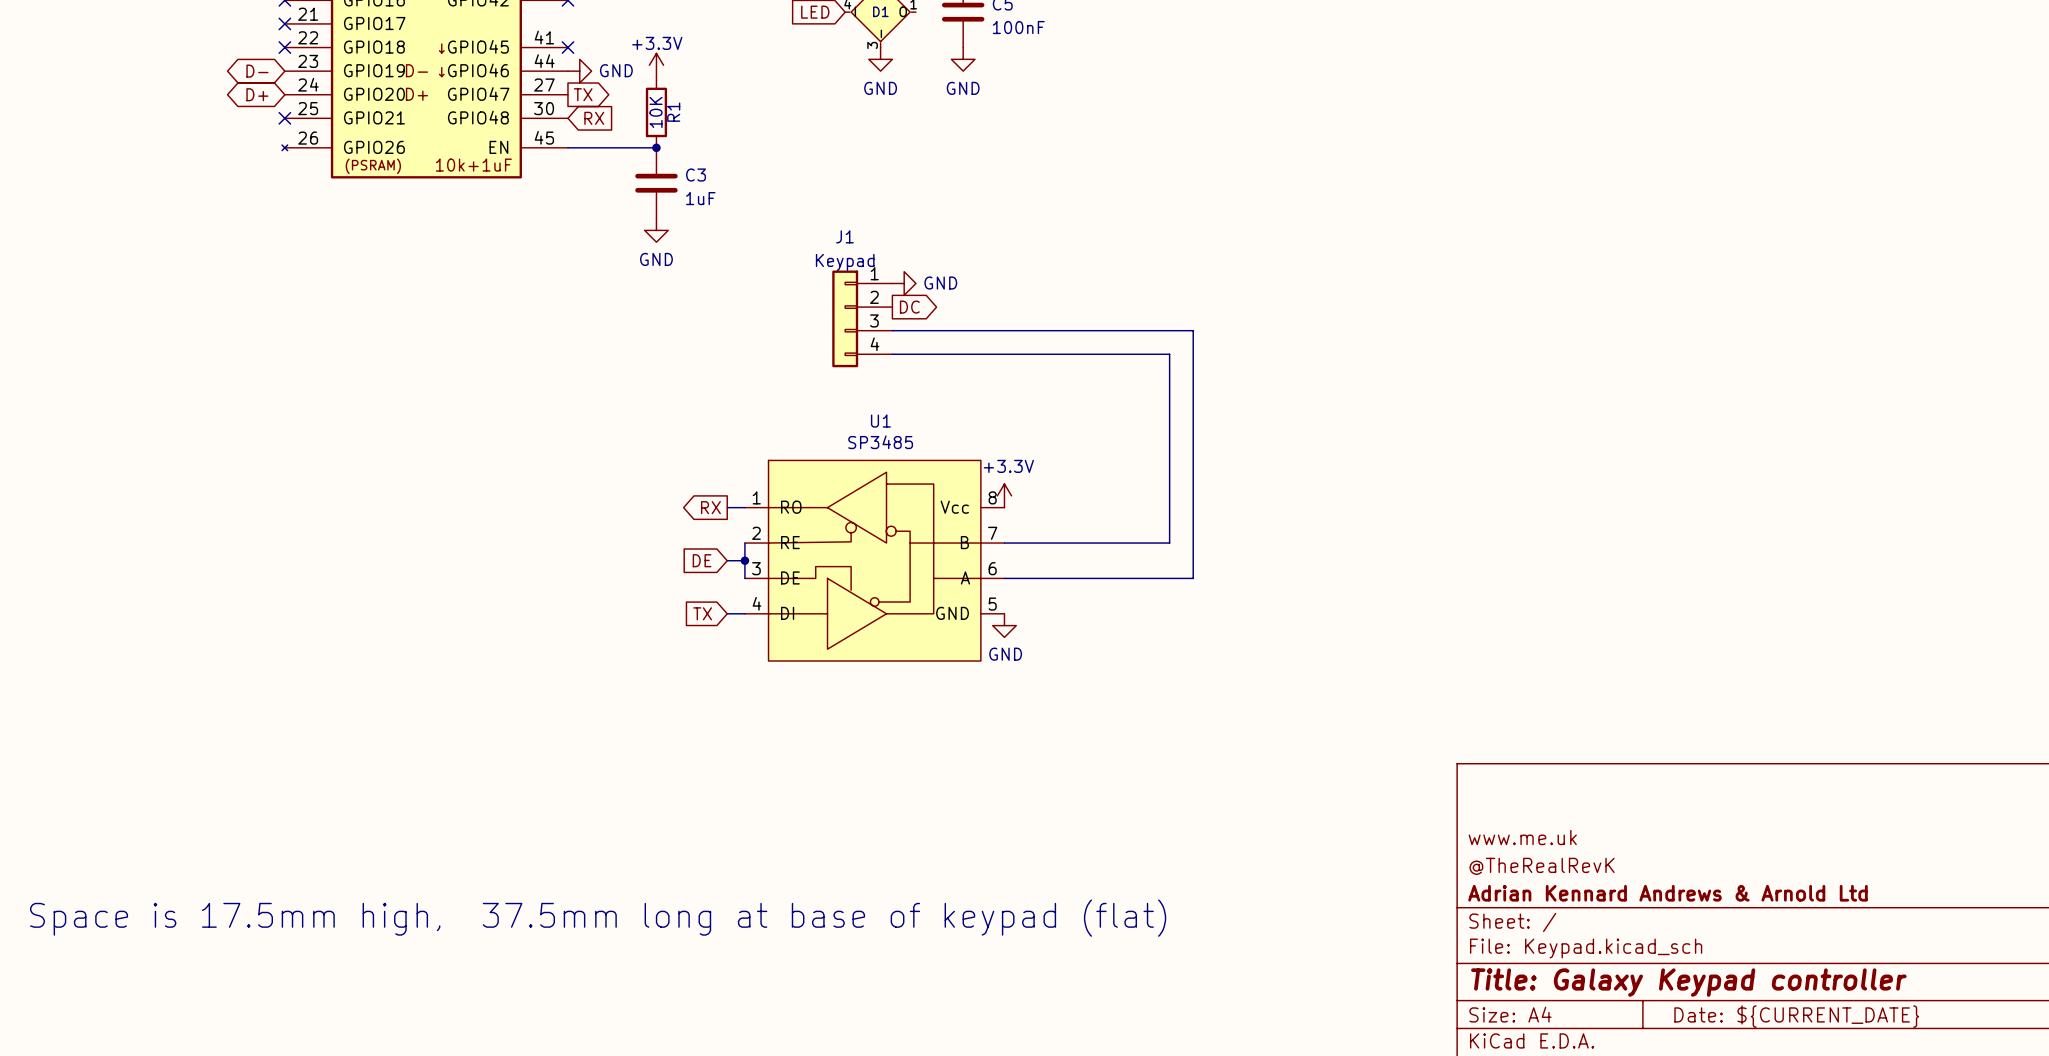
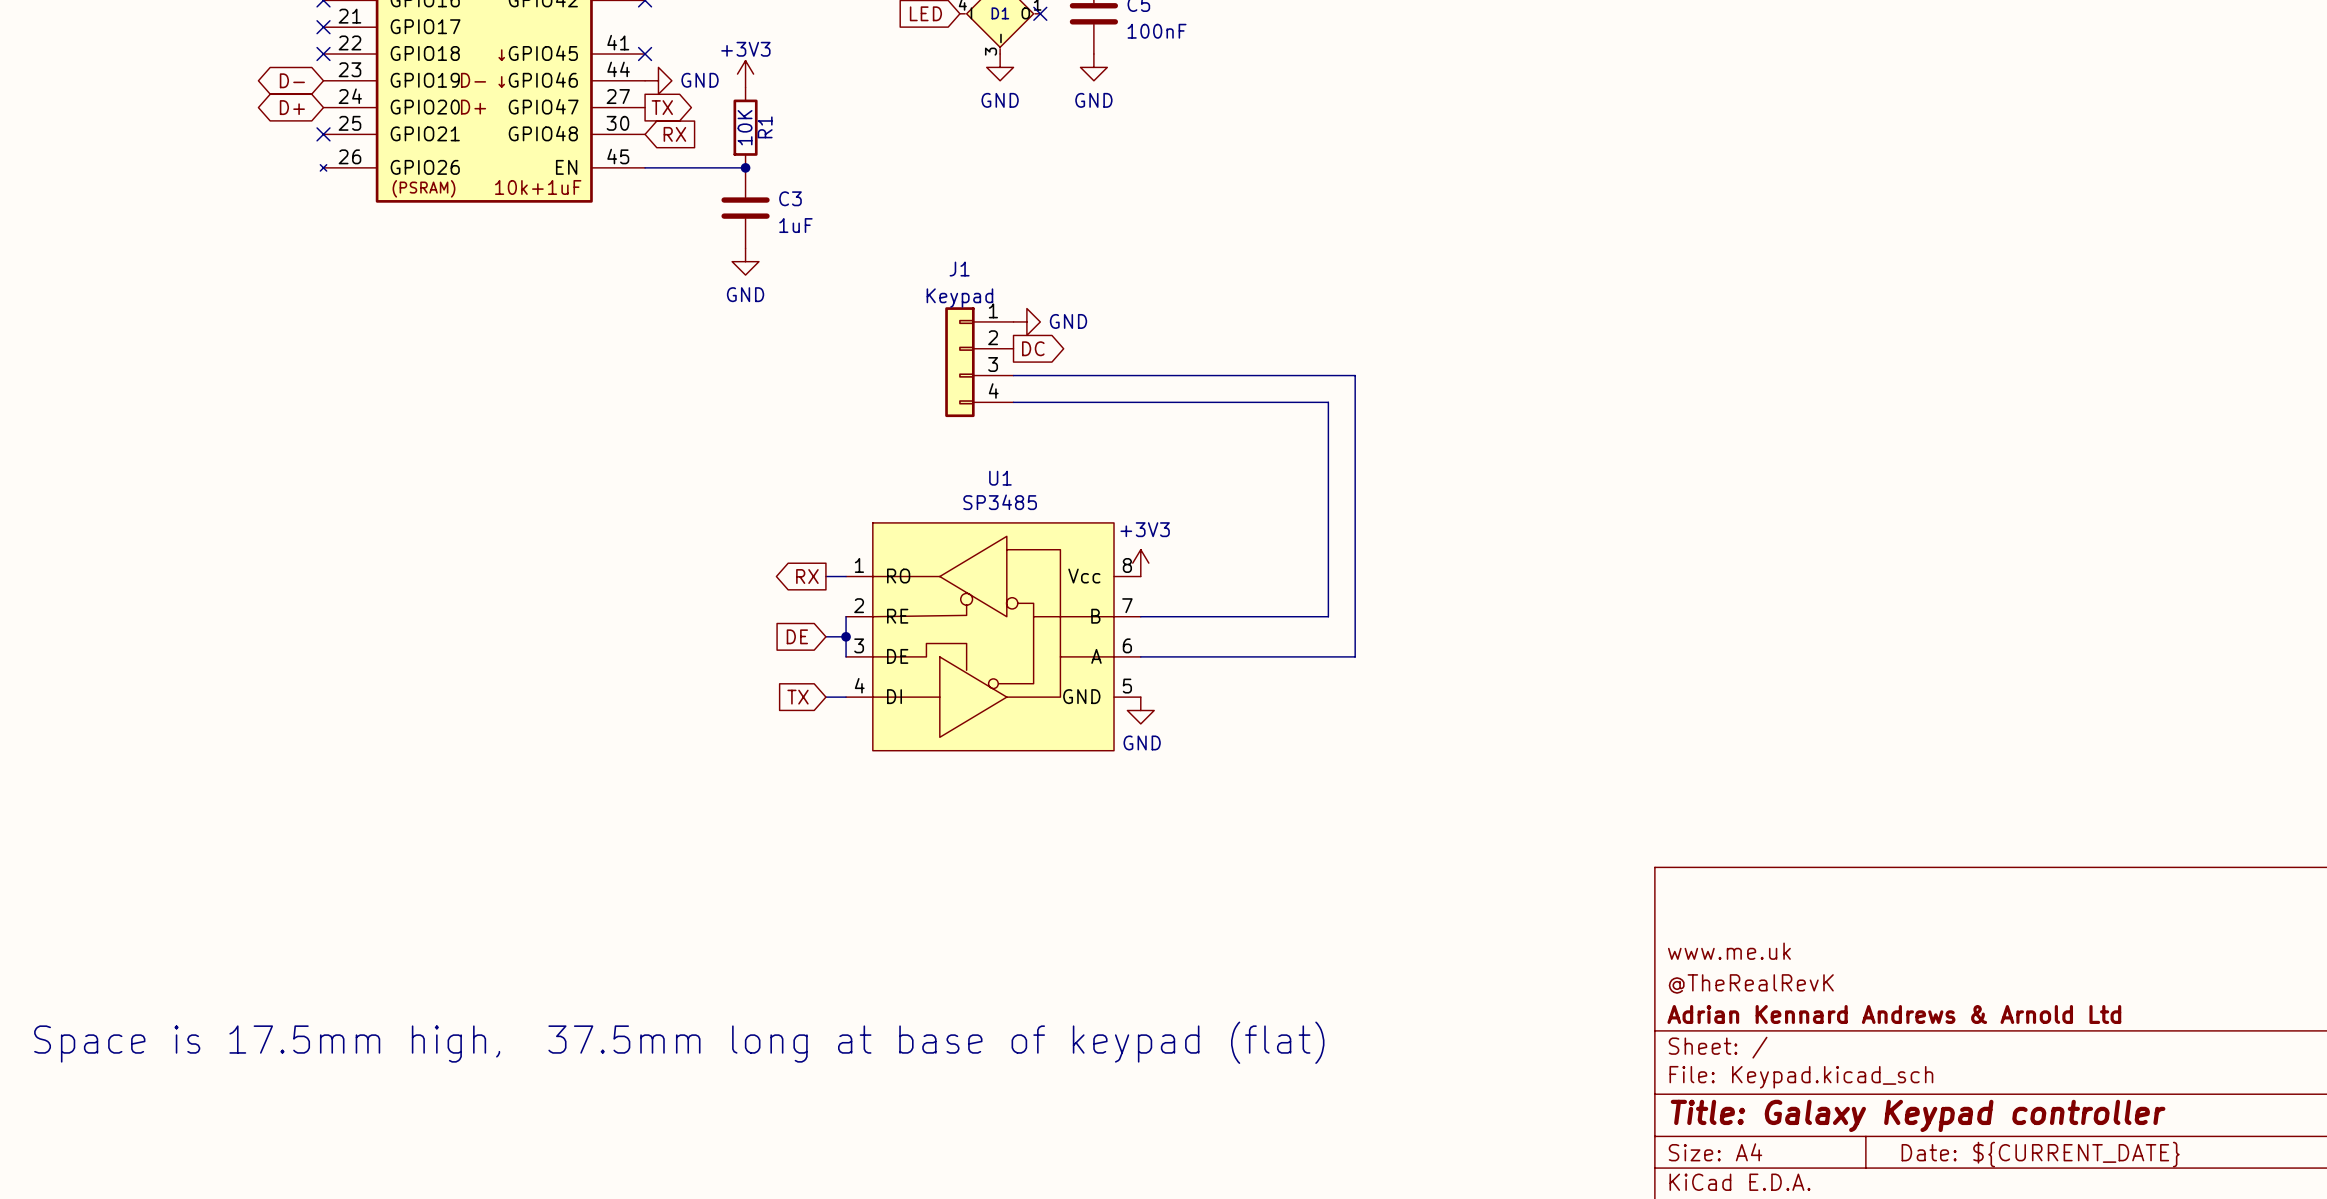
no-connect mark: none -> (1040, 13)
power symbol: +3.3V (656, 65) -> +3V3 (745, 74)
power symbol: +3.3V (1004, 495) -> +3V3 (1140, 563)

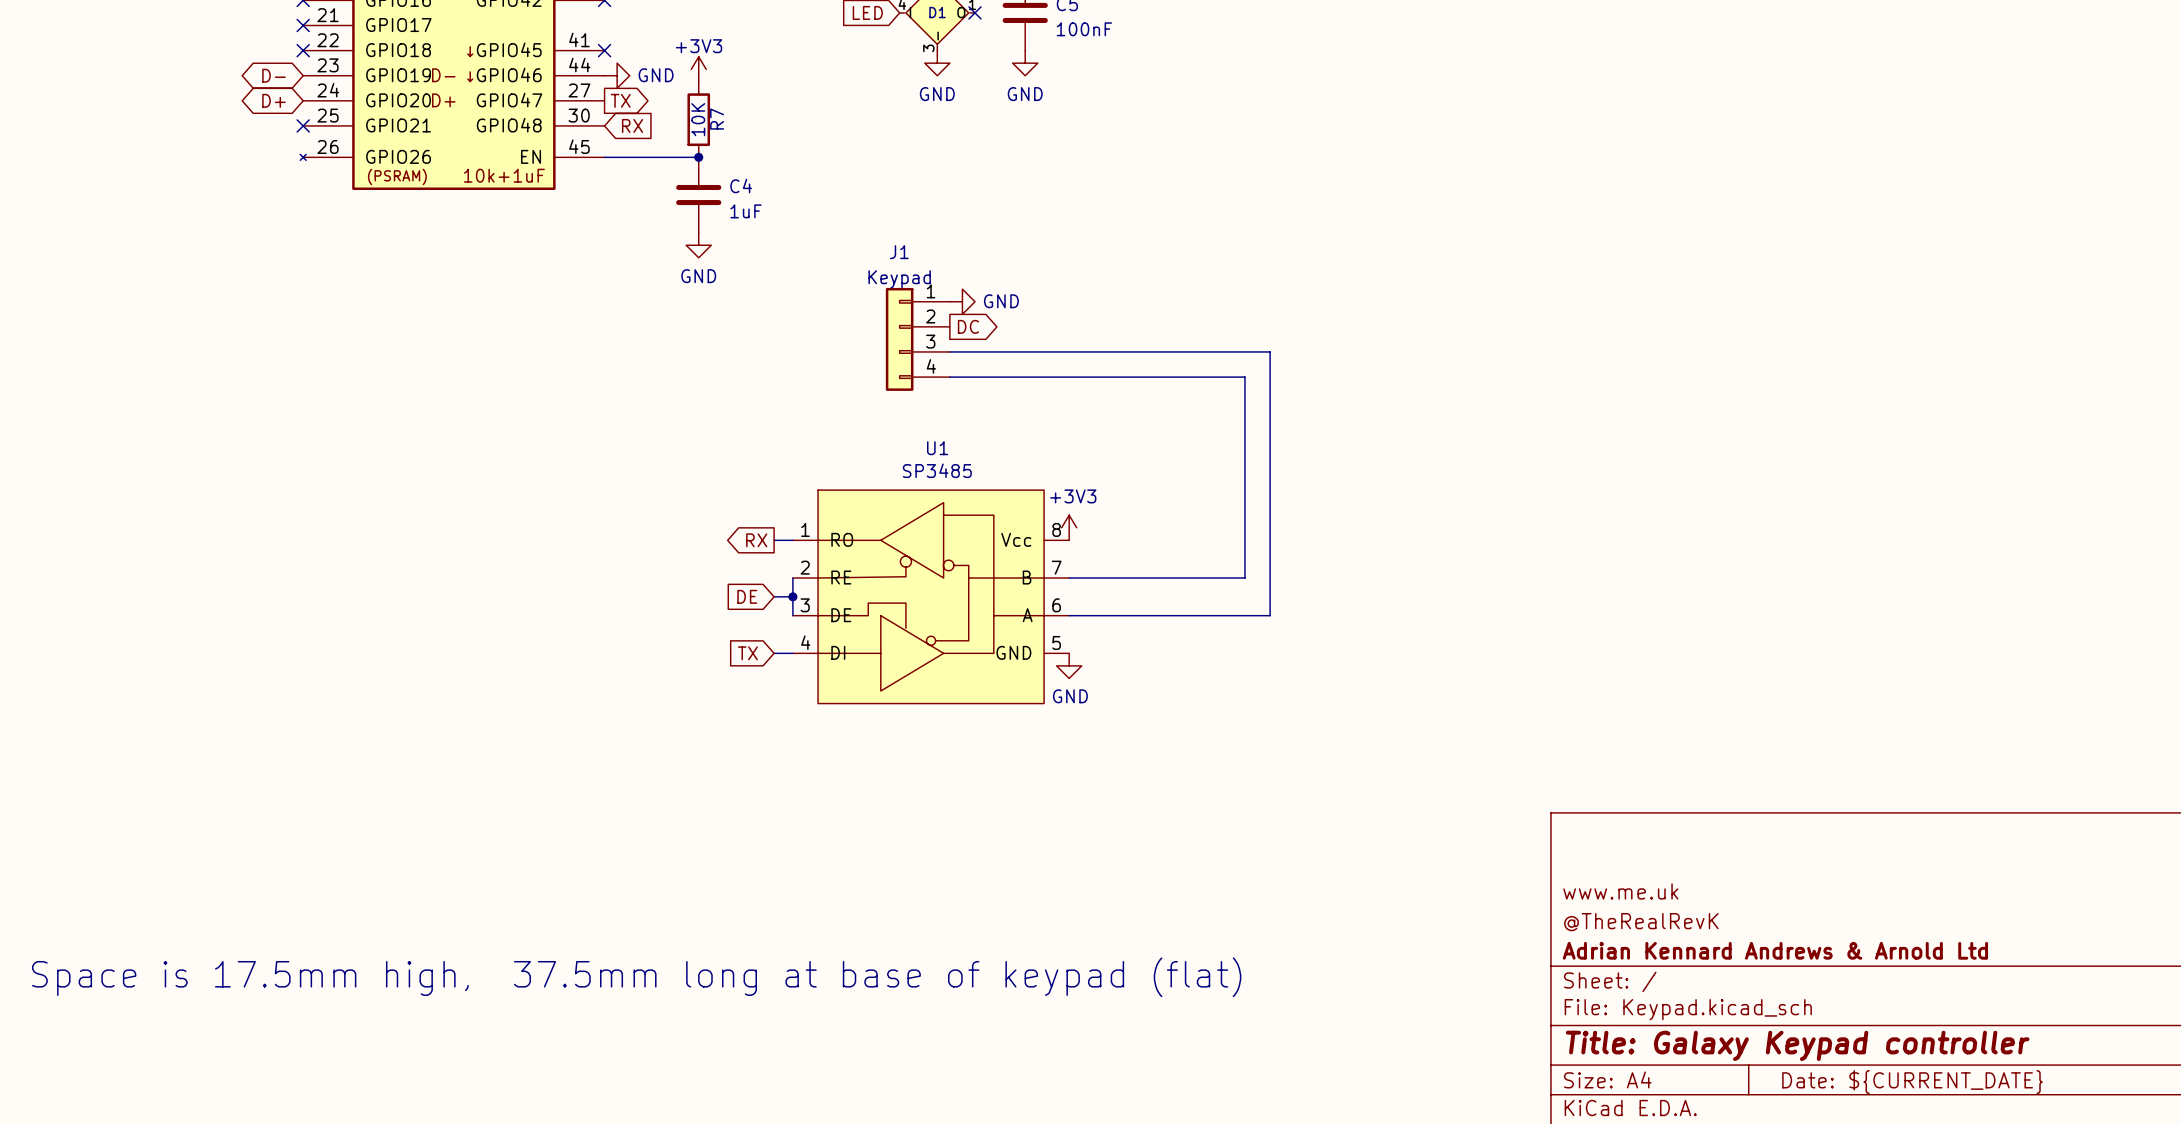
R1 name: R1 (765, 127) -> R7 (717, 119)
C3 name: C3 (790, 198) -> C4 (741, 185)

